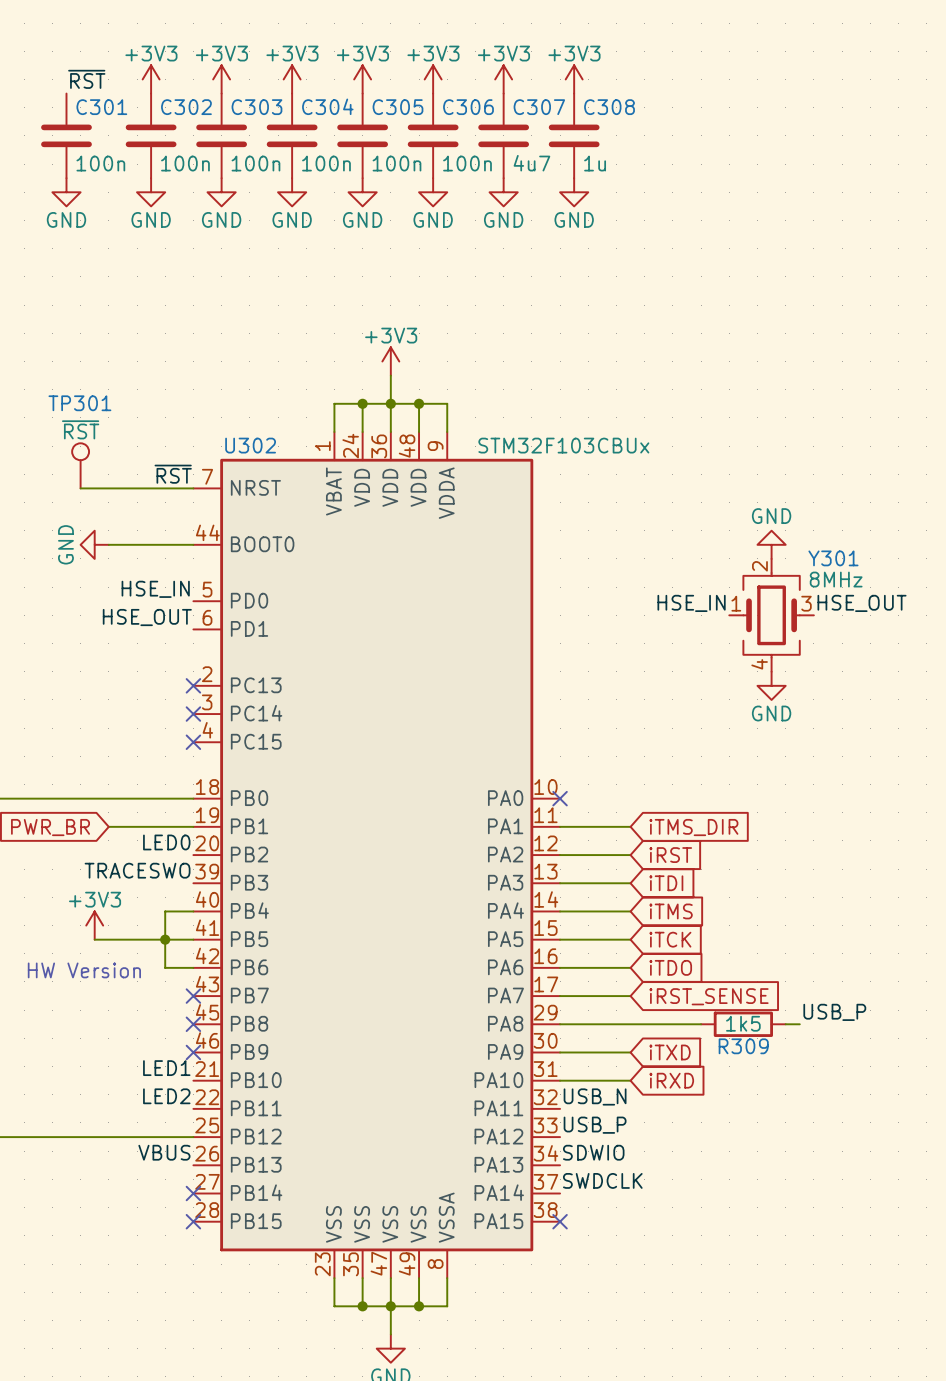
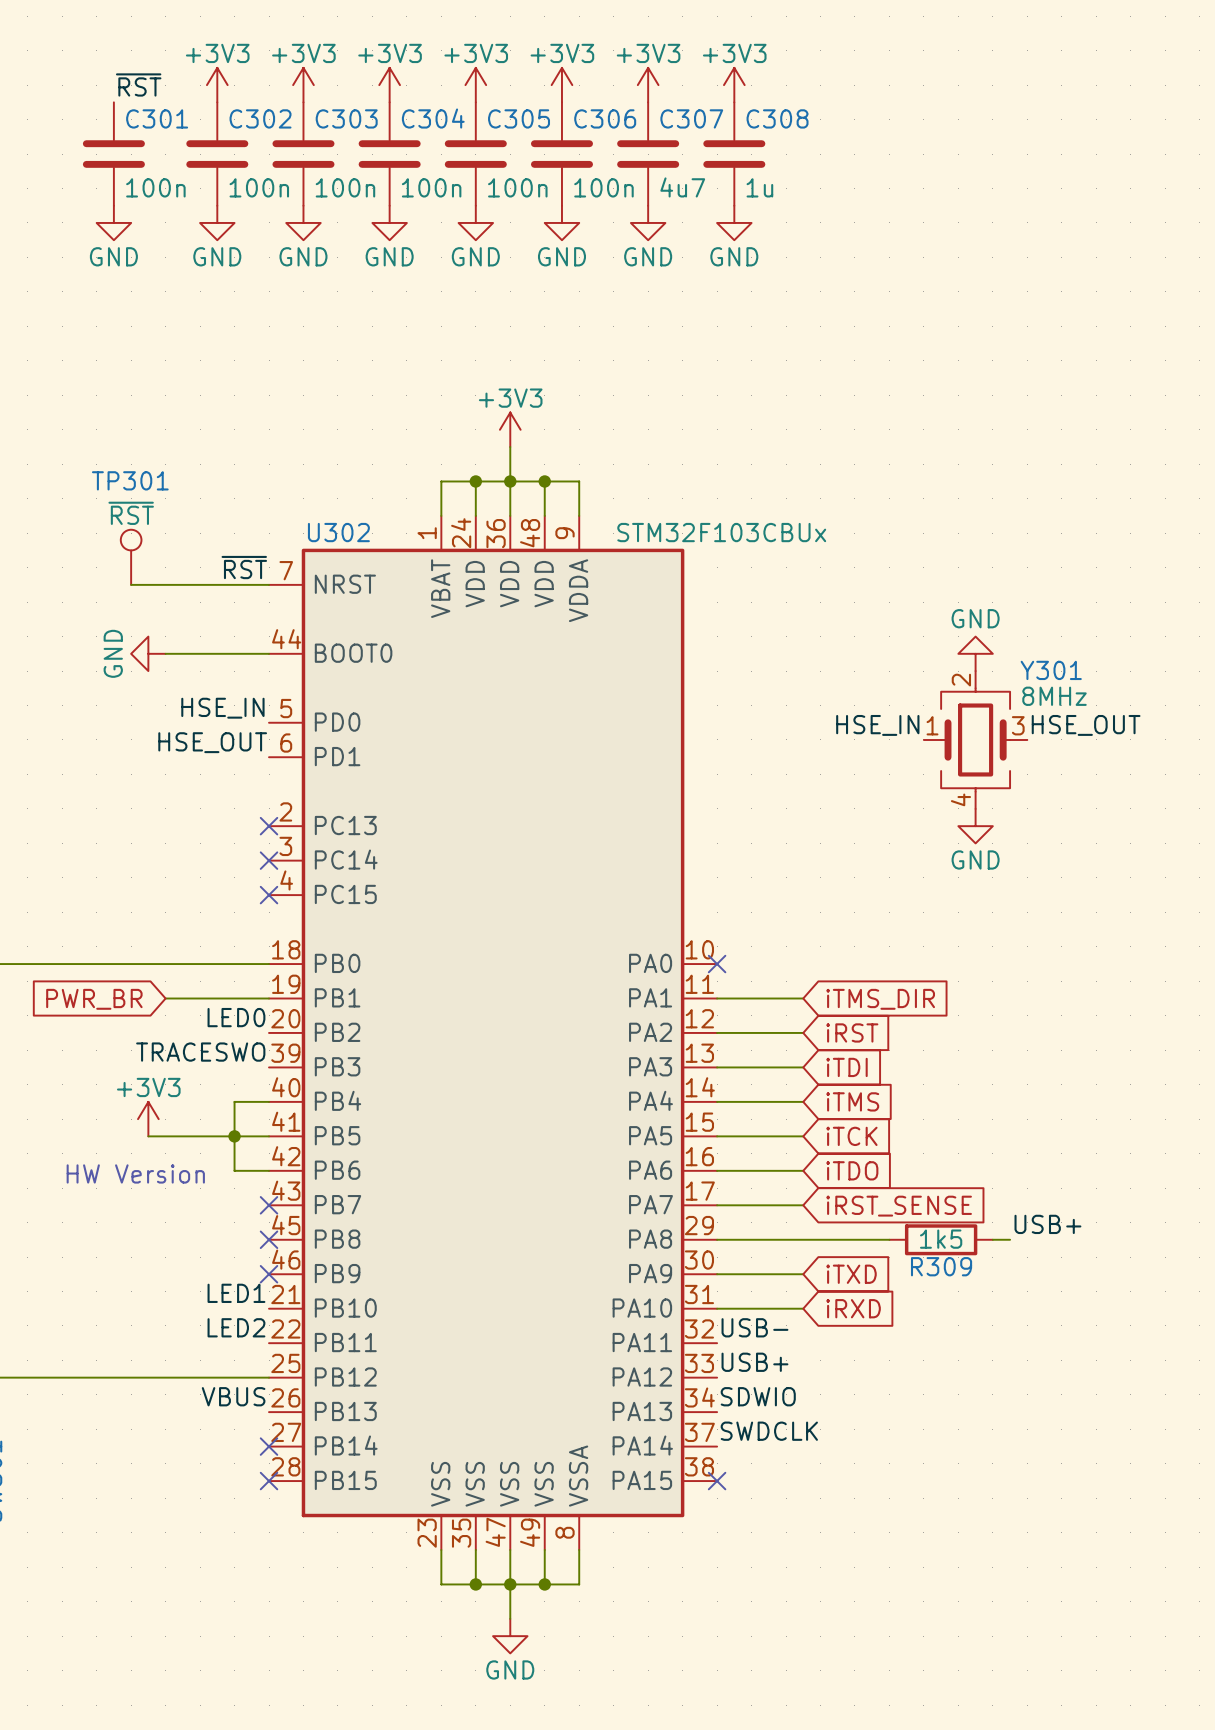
label: USB_P (834, 1012) -> USB+ (1047, 1224)
label: USB_N (595, 1096) -> USB- (754, 1327)
label: USB_P (595, 1125) -> USB+ (754, 1362)

